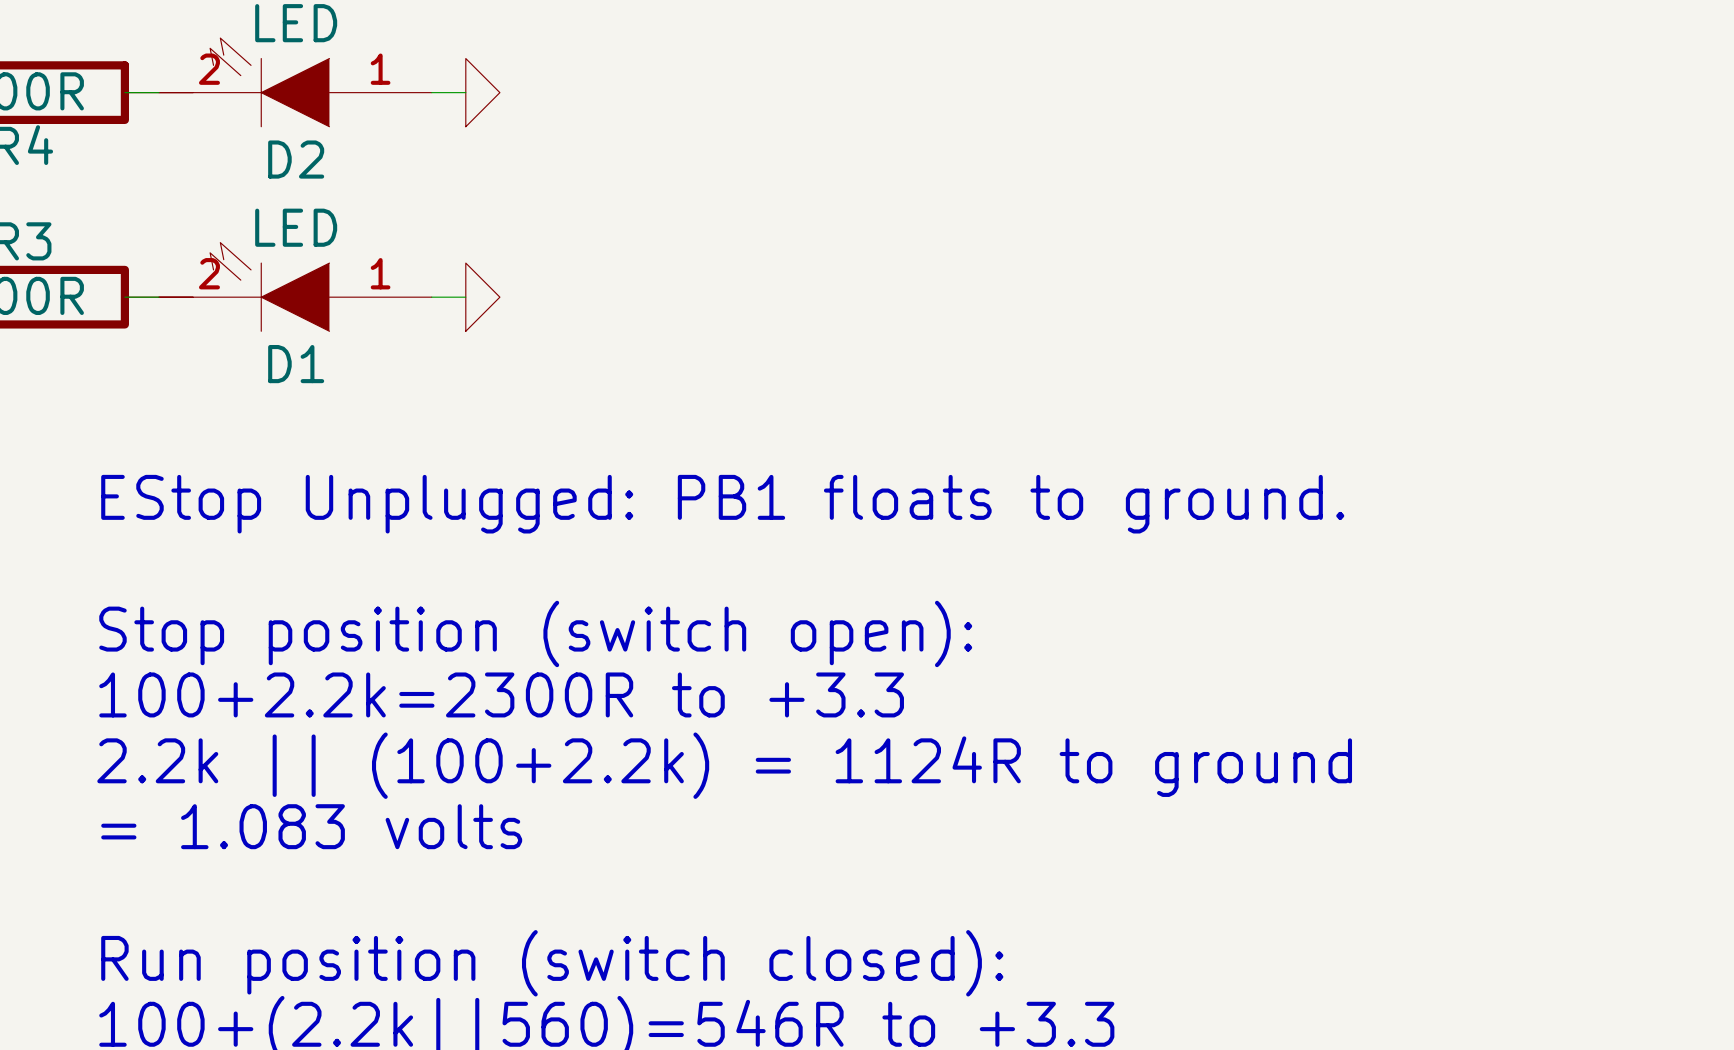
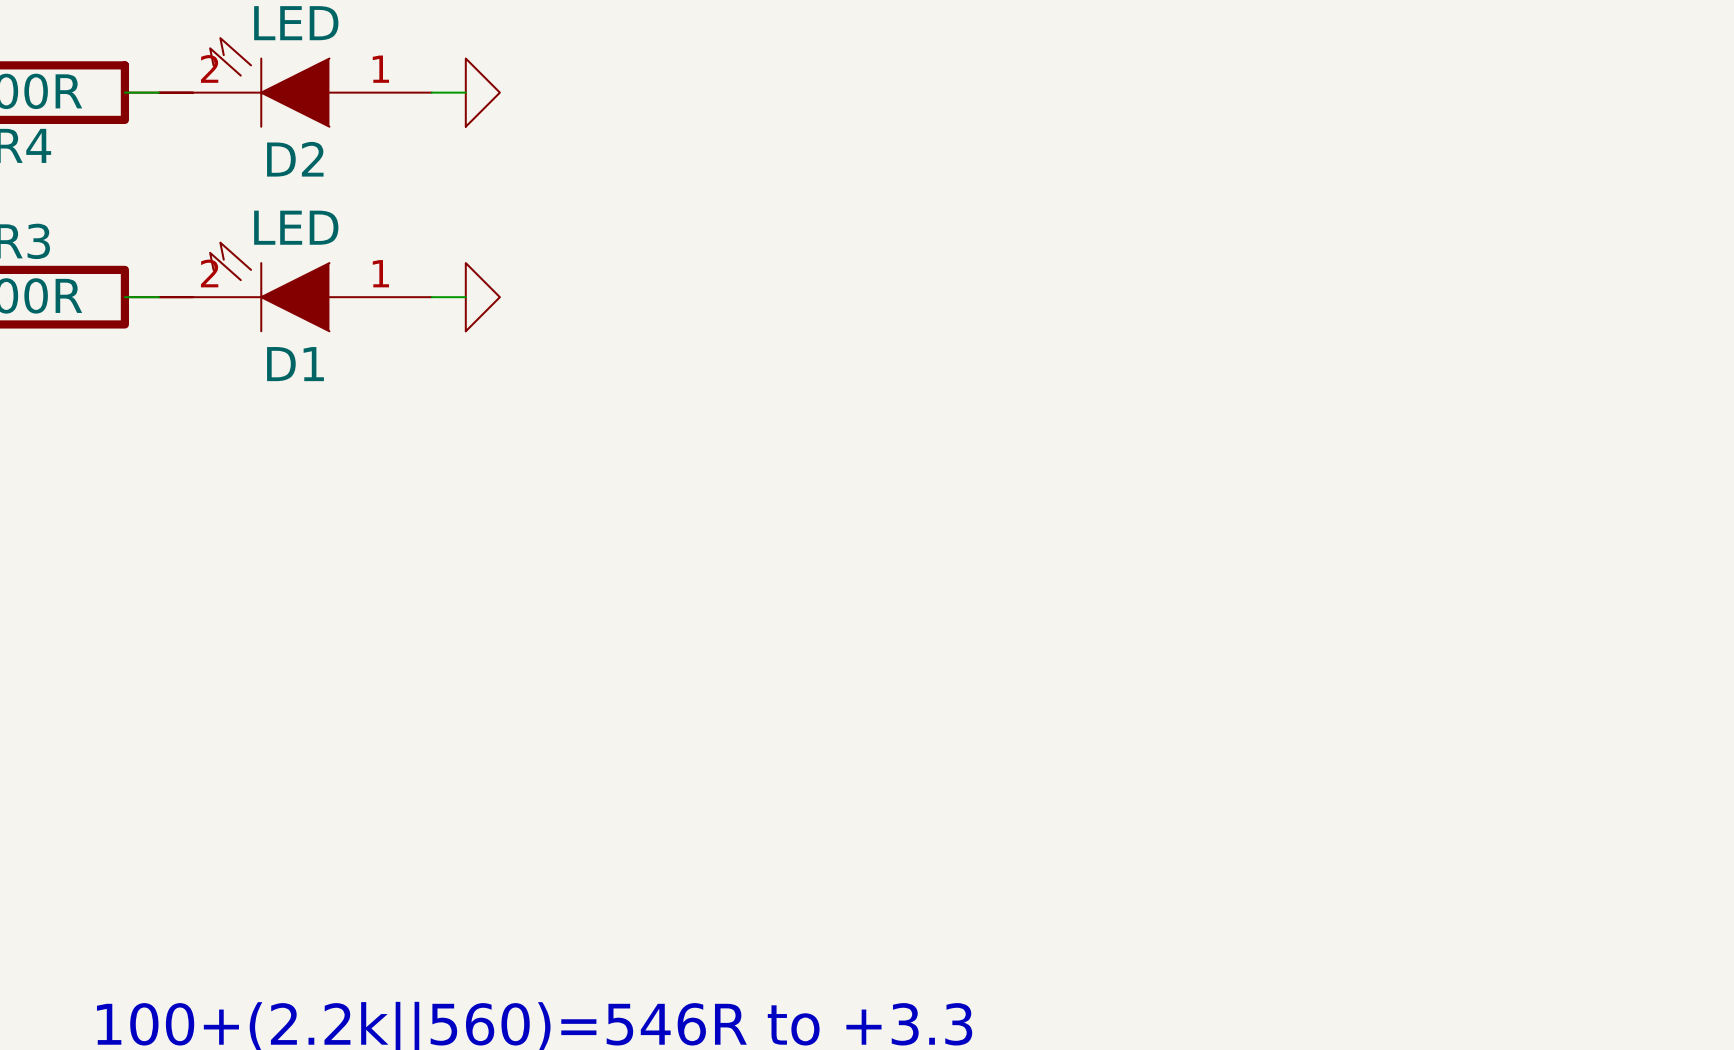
text: EStop Unplugged: PB1 floats to ground. (722, 504) -> none
text: Stop position (switch open): (535, 633) -> none
text: 100+2.2k=2300R to +3.3 (501, 694) -> none
text: 2.2k || (100+2.2k) = 1124R to ground (724, 765) -> none
text: = 1.083 volts (311, 826) -> none
text: Run position (switch closed): (552, 963) -> none

